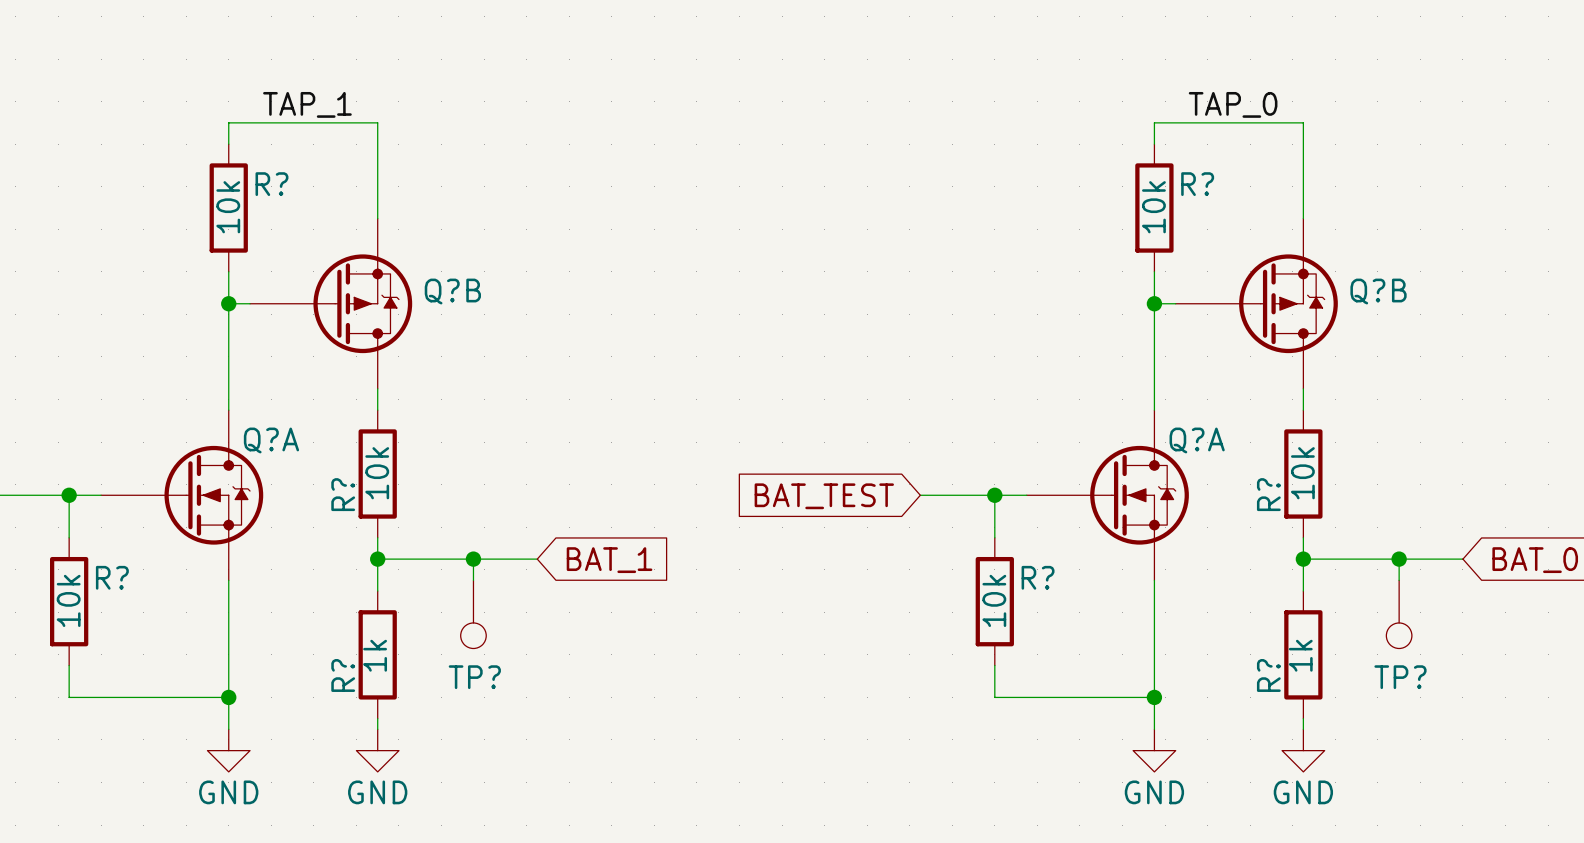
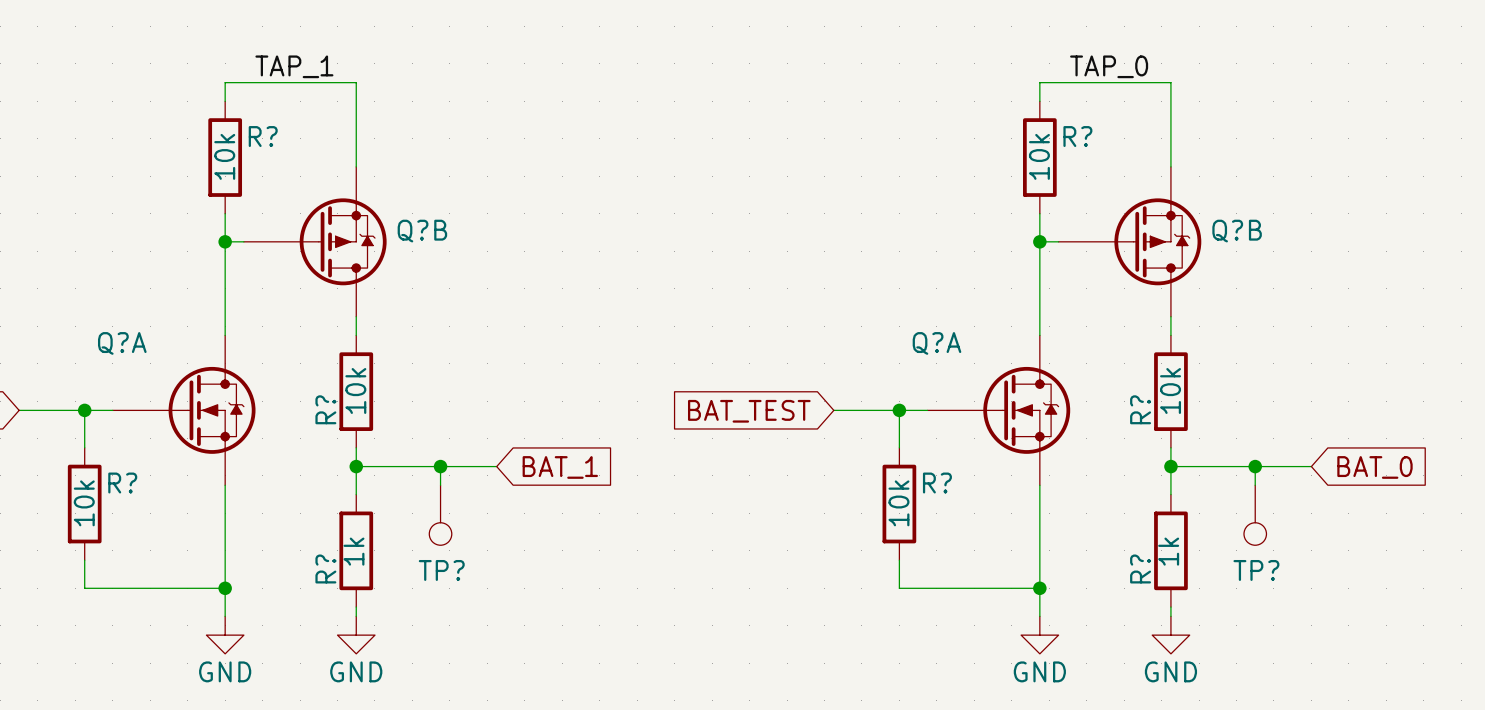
Q?A name position: Q?A (271, 440) -> Q?A (122, 343)
Q?A name position: Q?A (1197, 440) -> Q?A (936, 343)

